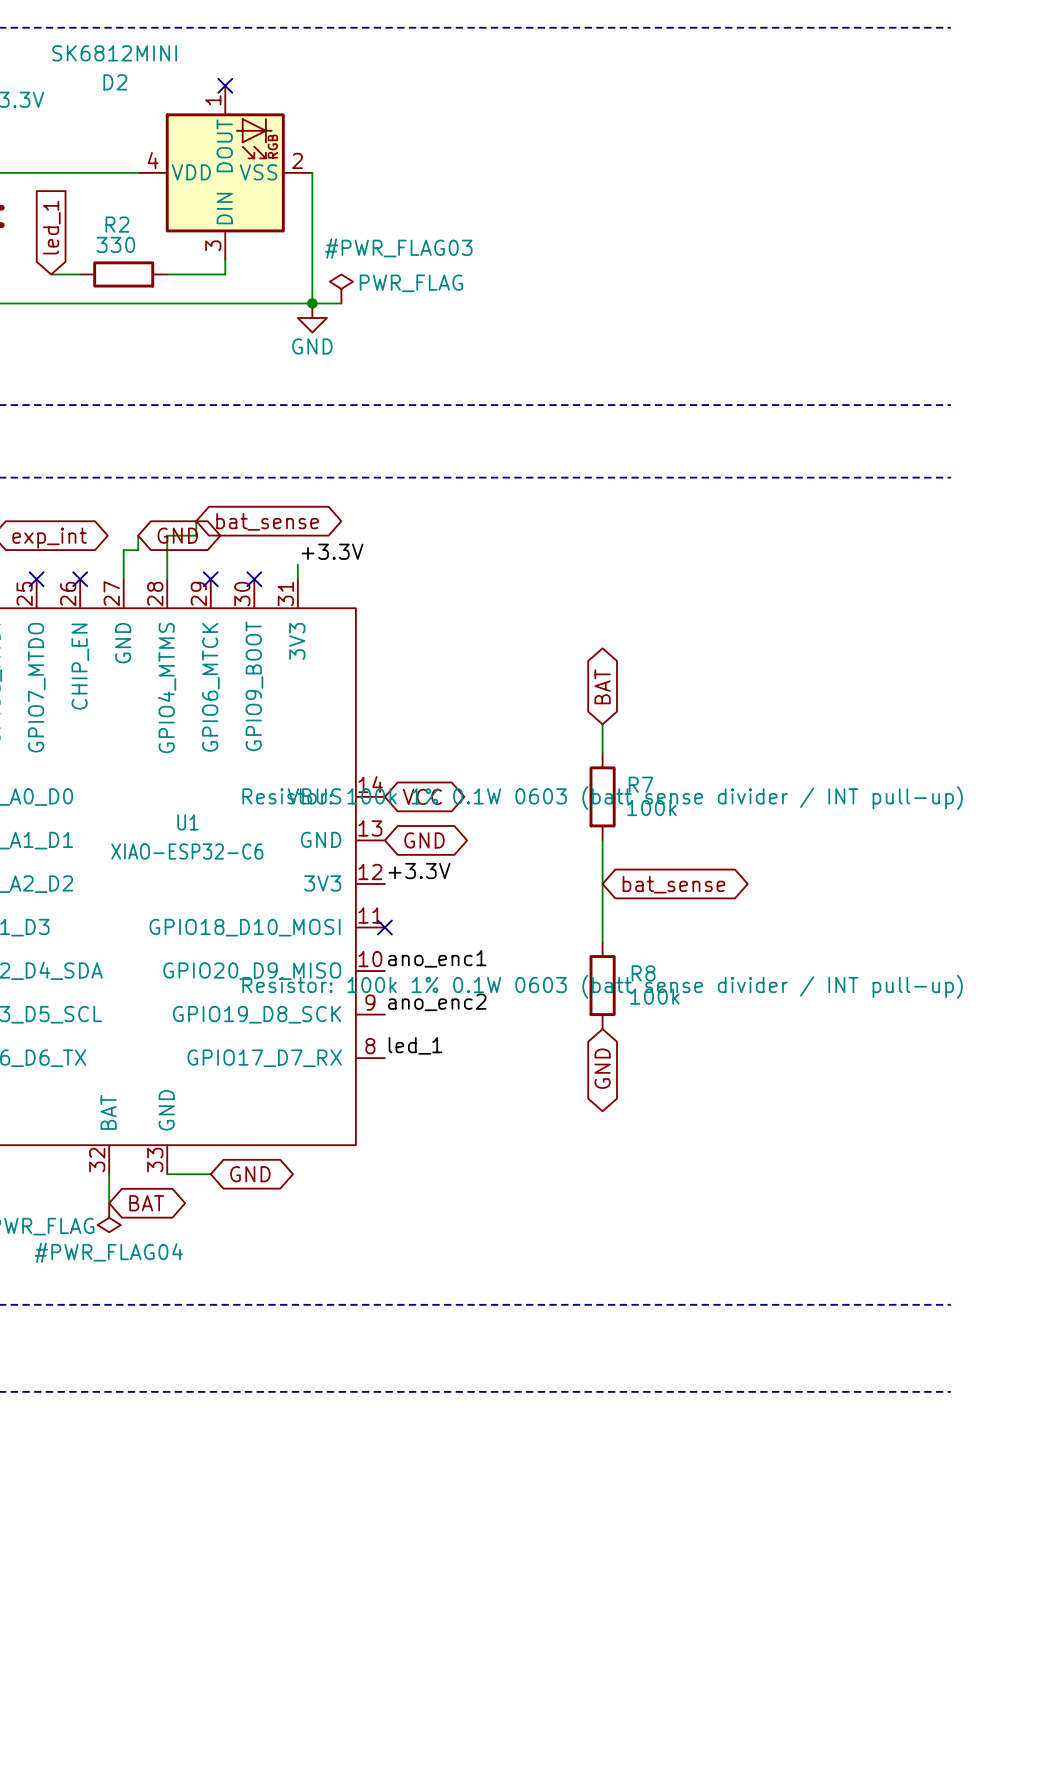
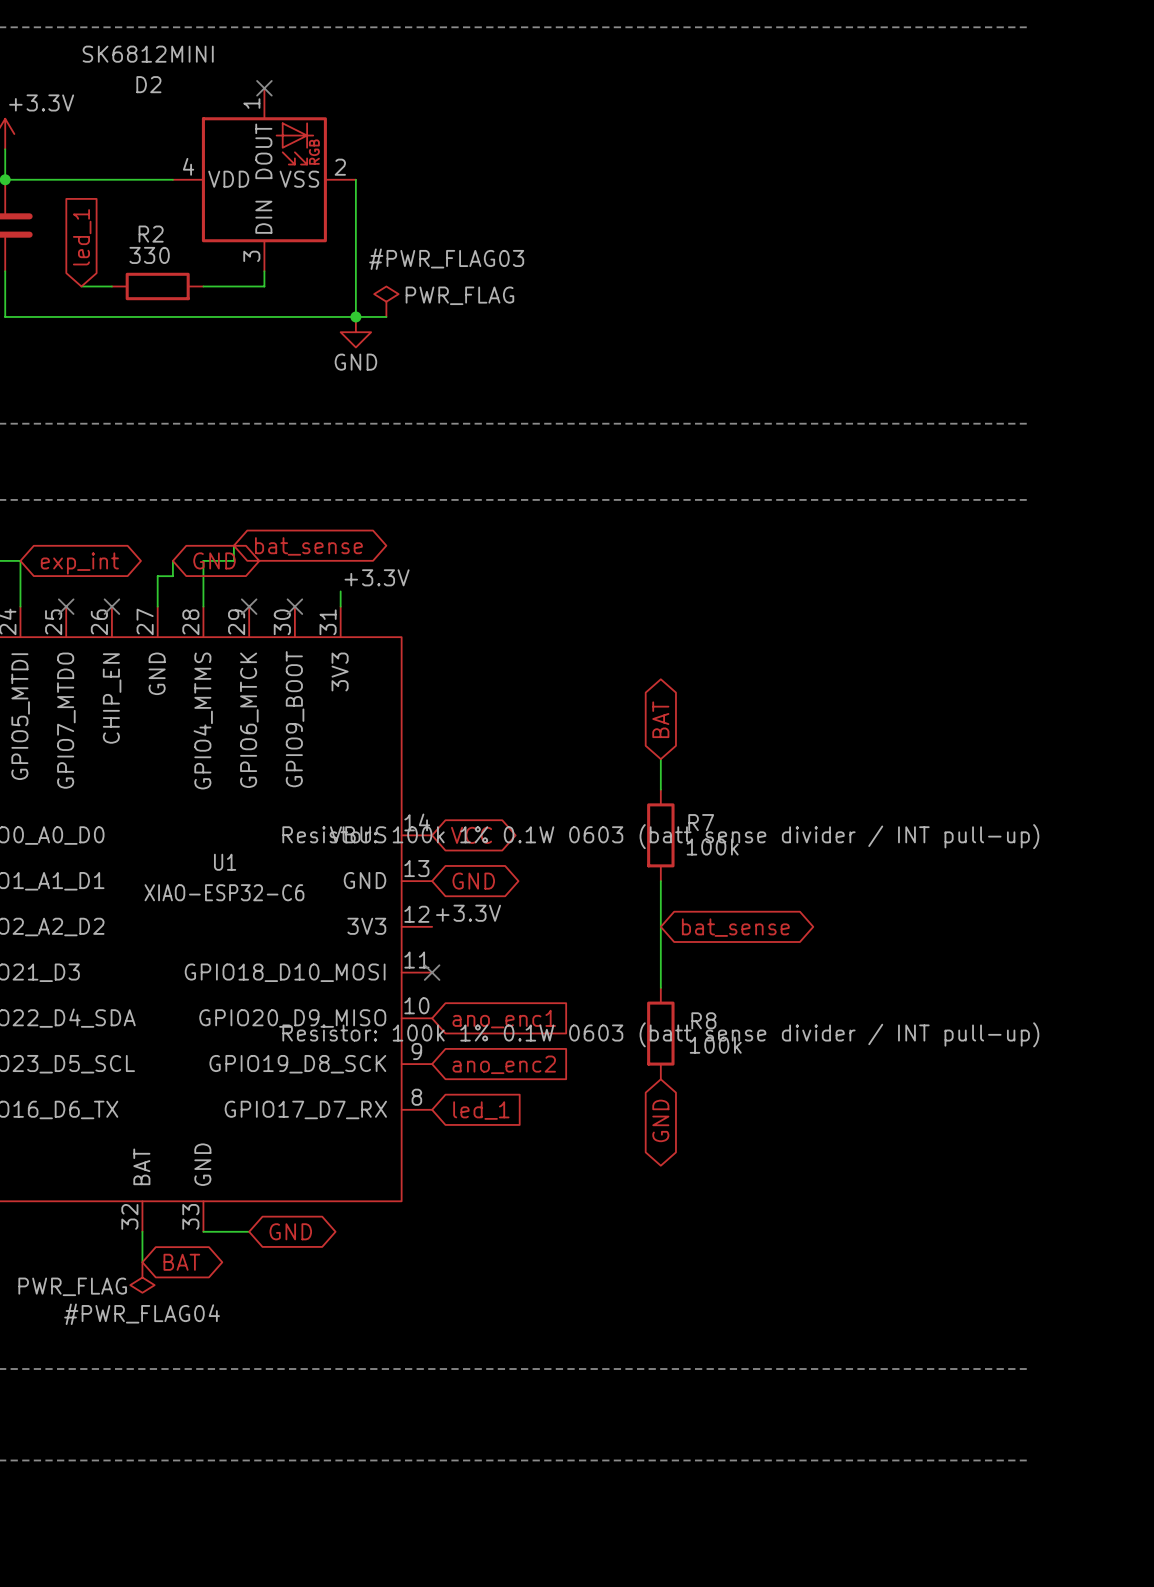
label: ano_enc1 (437, 958) -> none
global label: none -> ano_enc1 (504, 1019)
label: ano_enc2 (437, 1002) -> none
global label: none -> ano_enc2 (504, 1064)
label: led_1 (415, 1045) -> none
global label: none -> led_1 (481, 1110)

